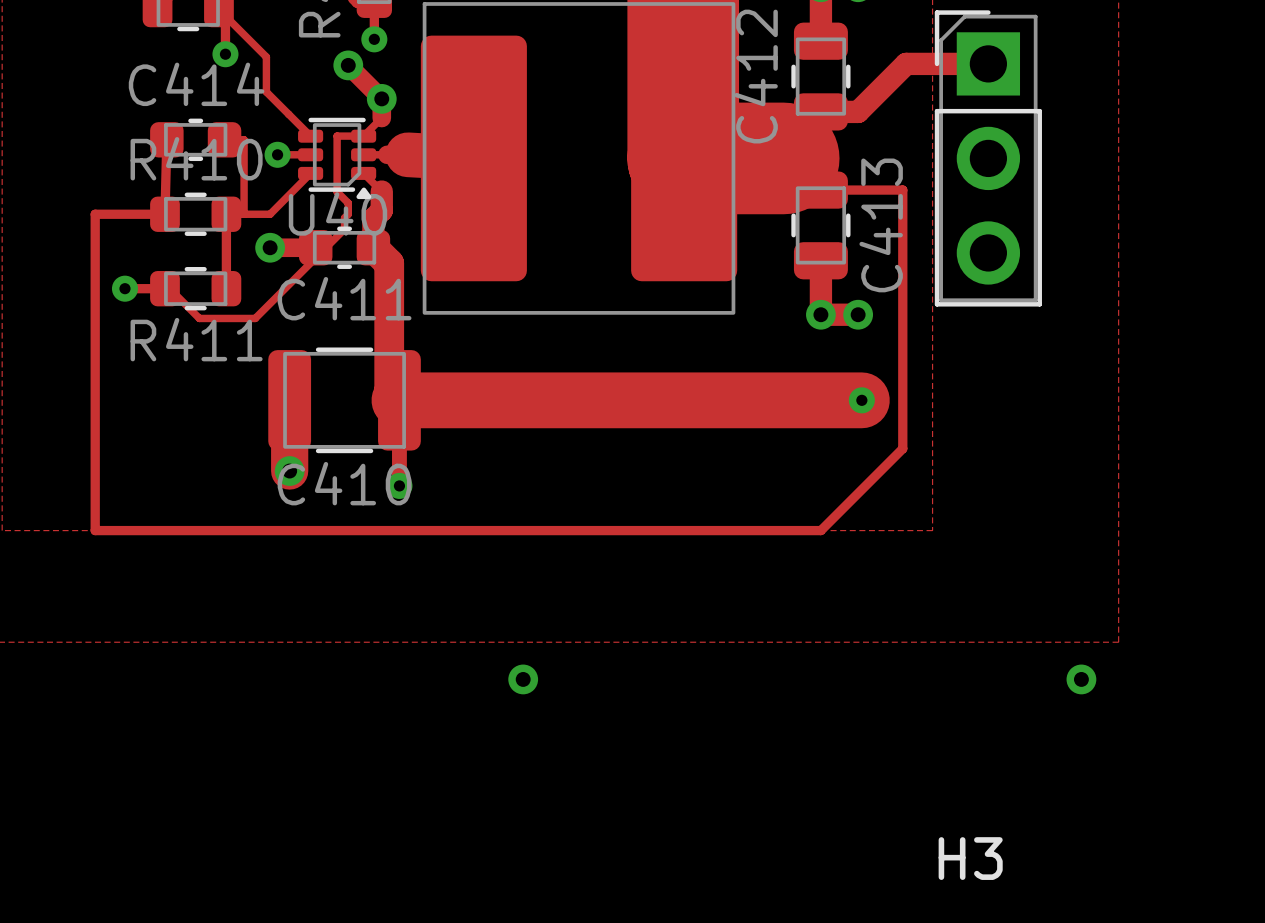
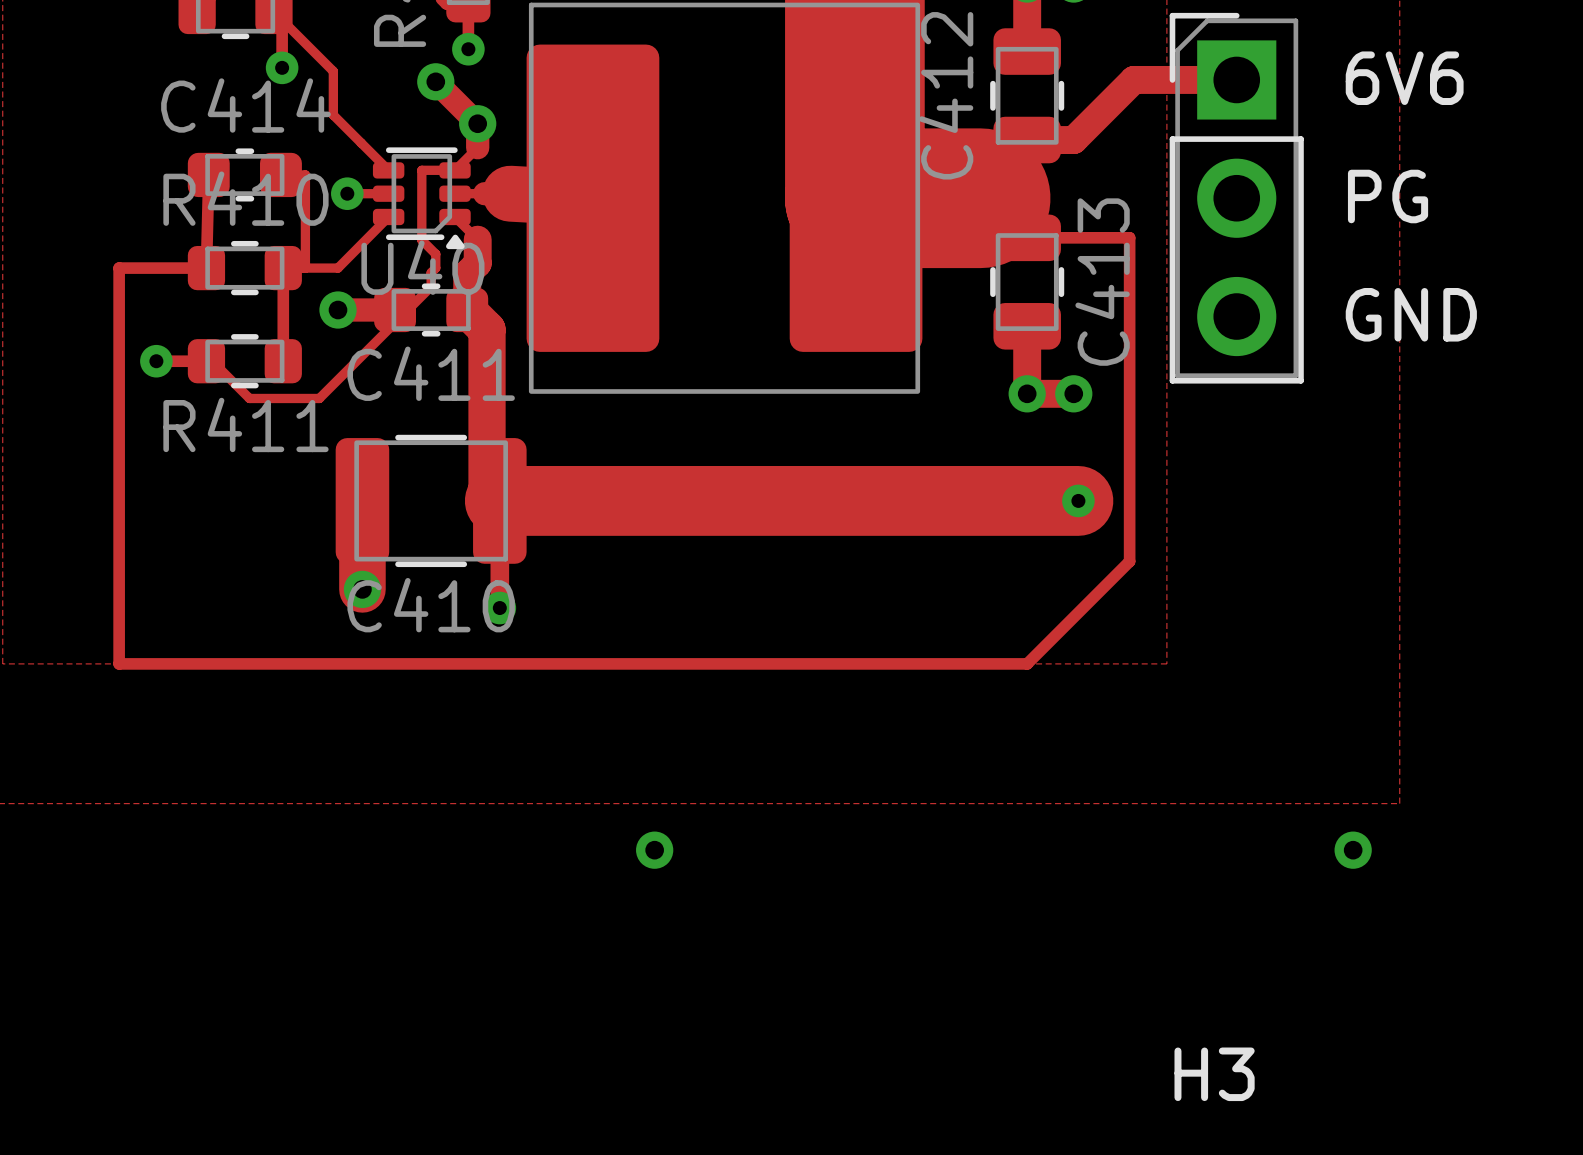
text: none -> 6V6 (1404, 78)
text: none -> PG (1388, 196)
text: none -> GND (1411, 314)

